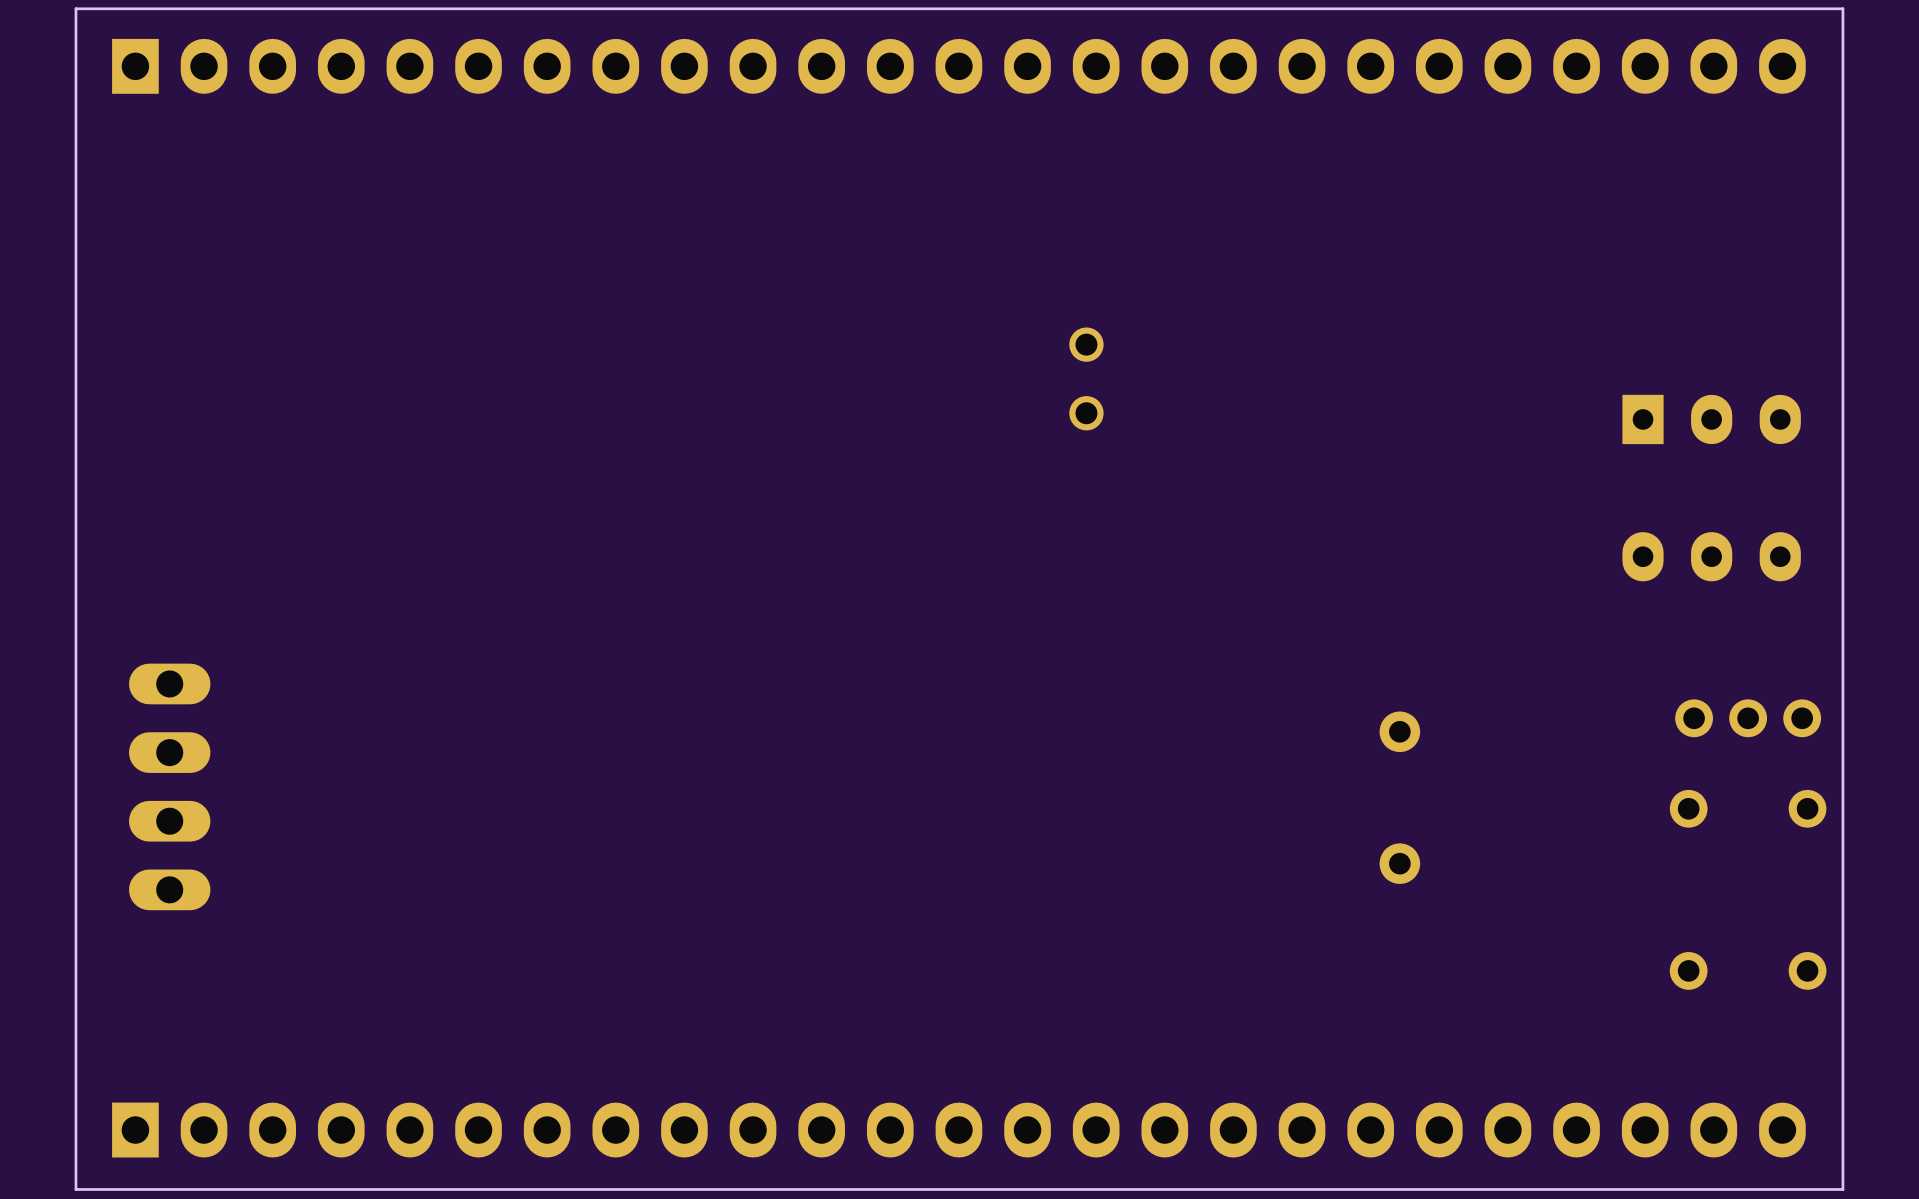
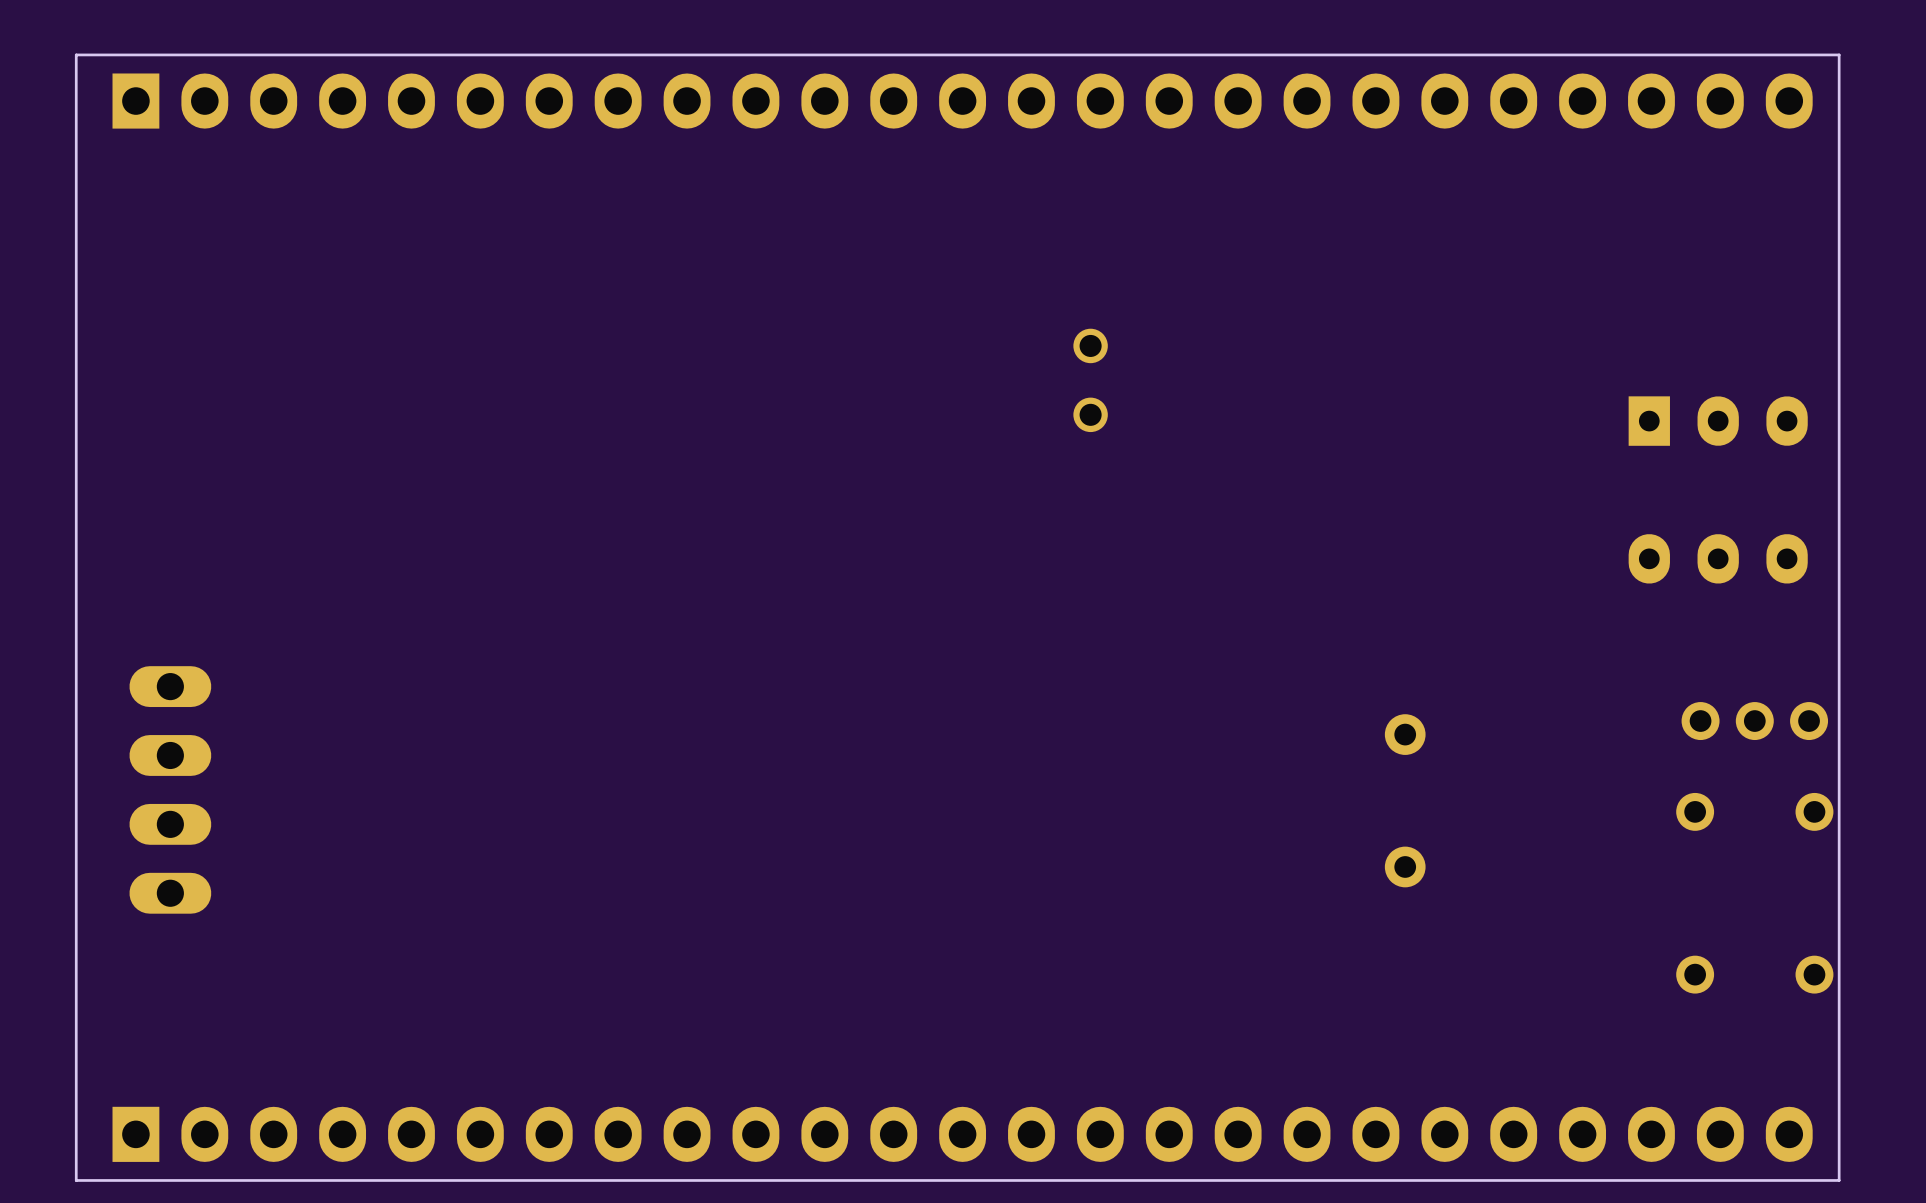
board edge: (75, 54) (75, 8) (1842, 8) (1842, 1189) (75, 1189) (75, 1175) -> (76, 54) (1839, 54) (1839, 1180) (76, 1180)
part position: (958, 66) -> (962, 101)

